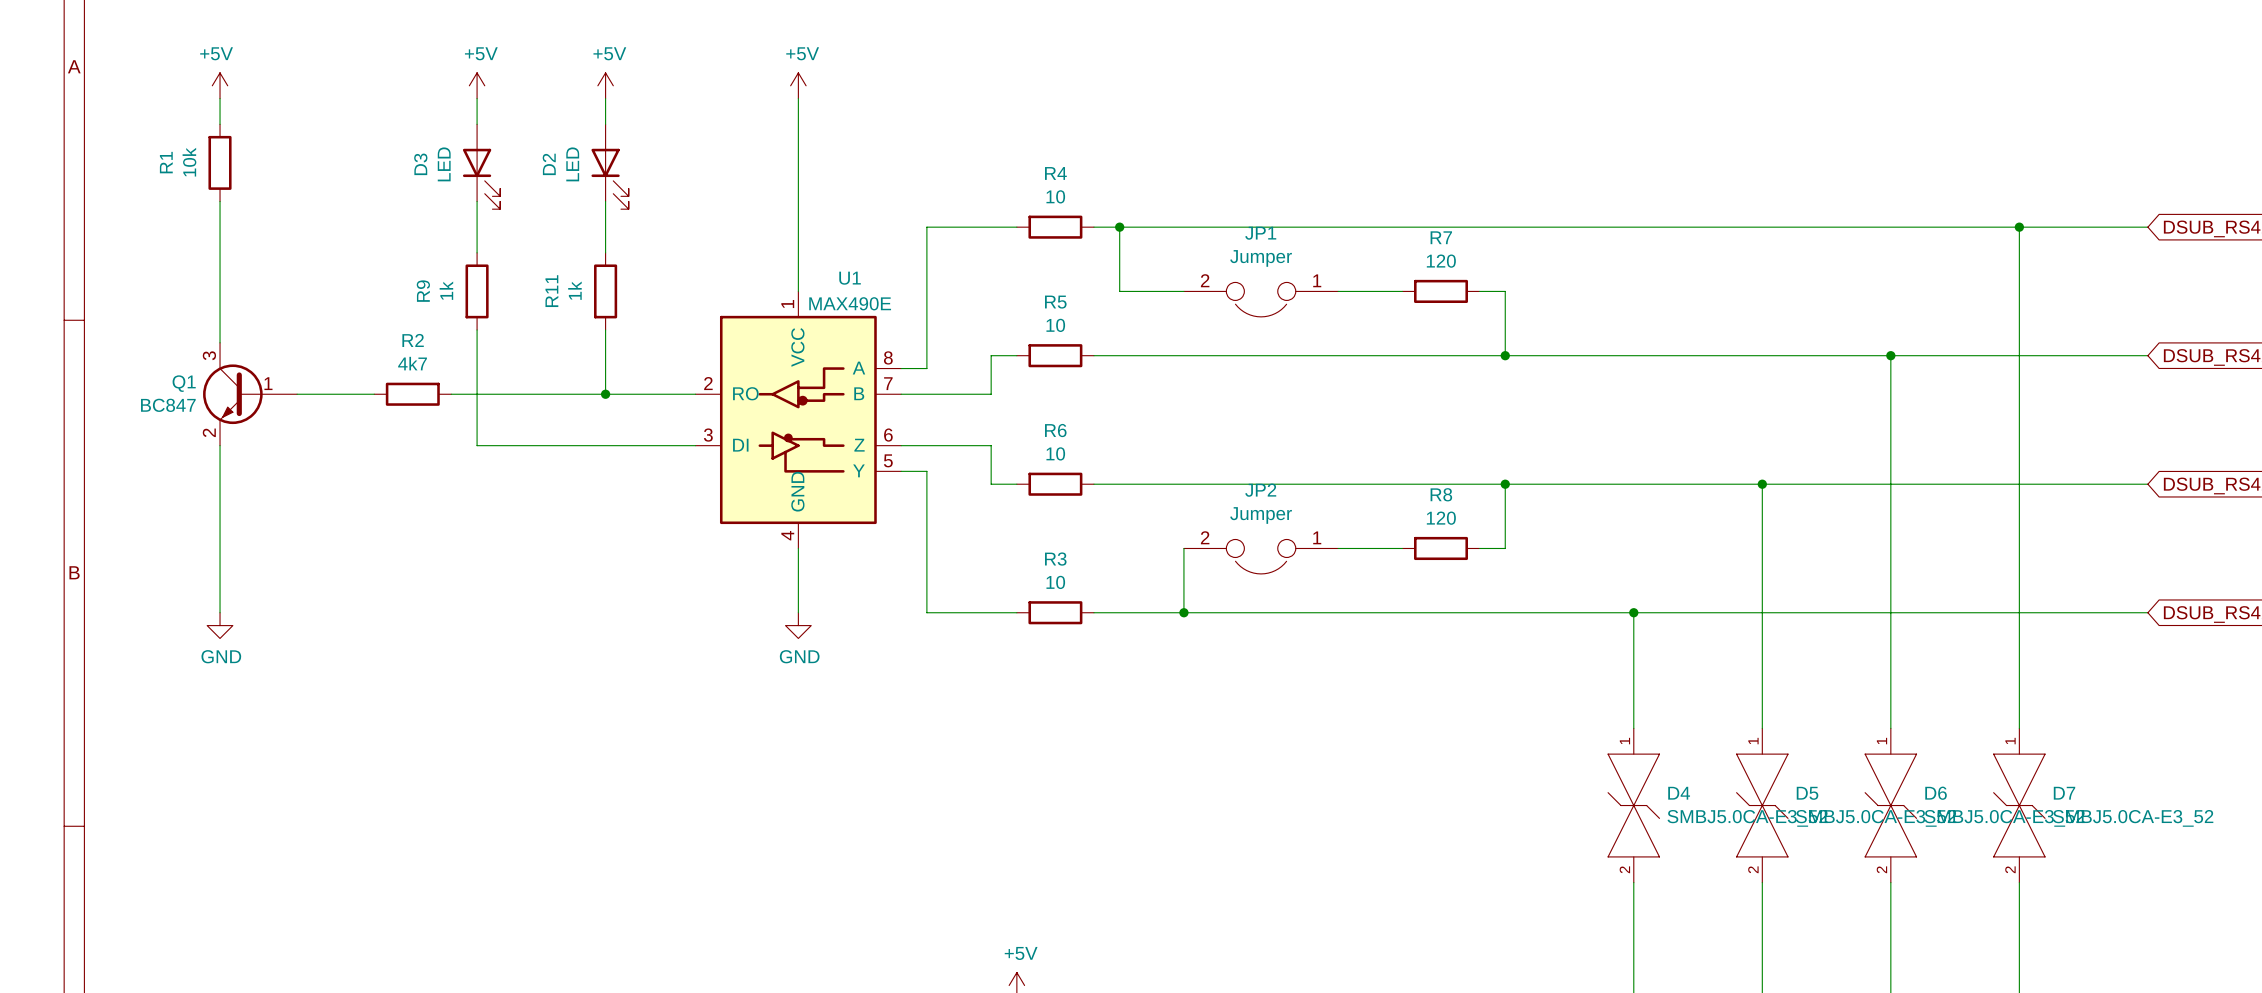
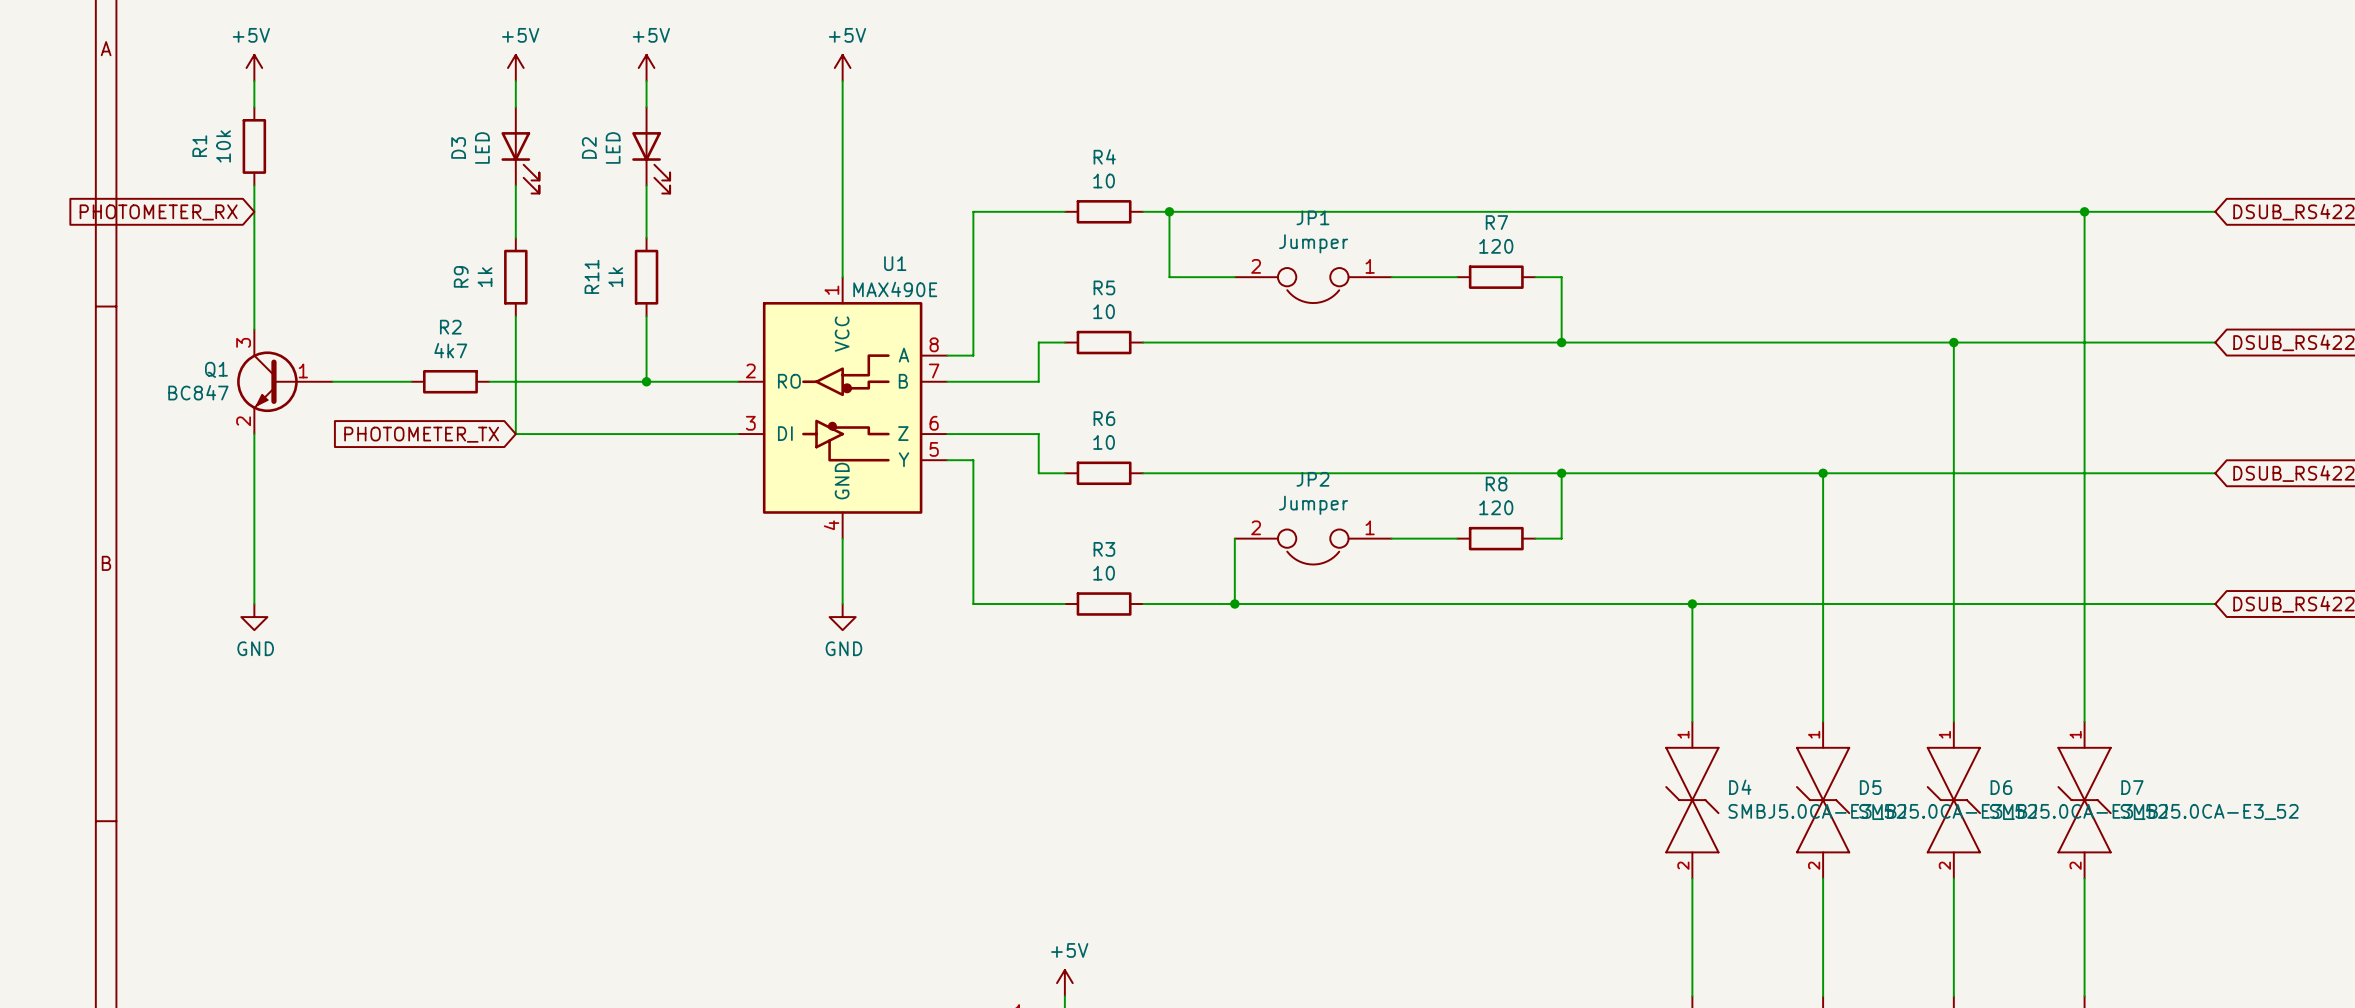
global label: none -> PHOTOMETER_RX (158, 212)
global label: none -> PHOTOMETER_TX (421, 434)

